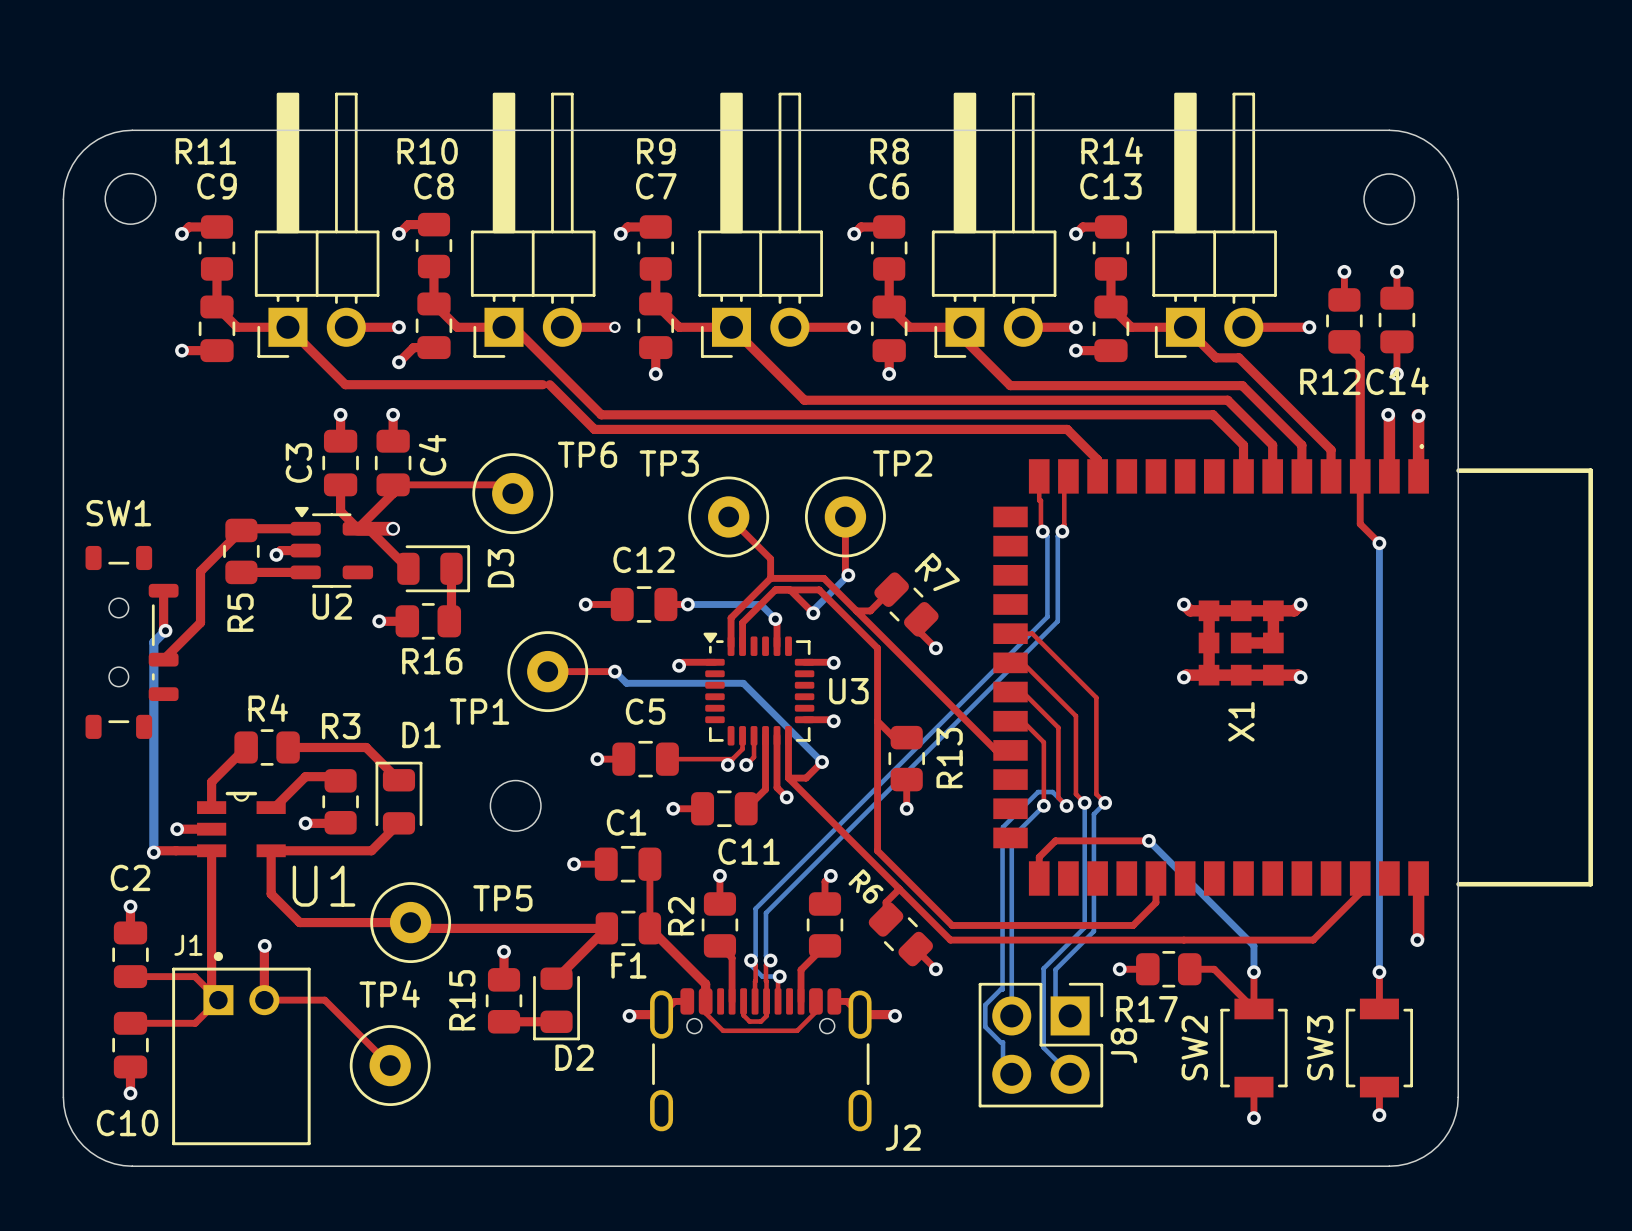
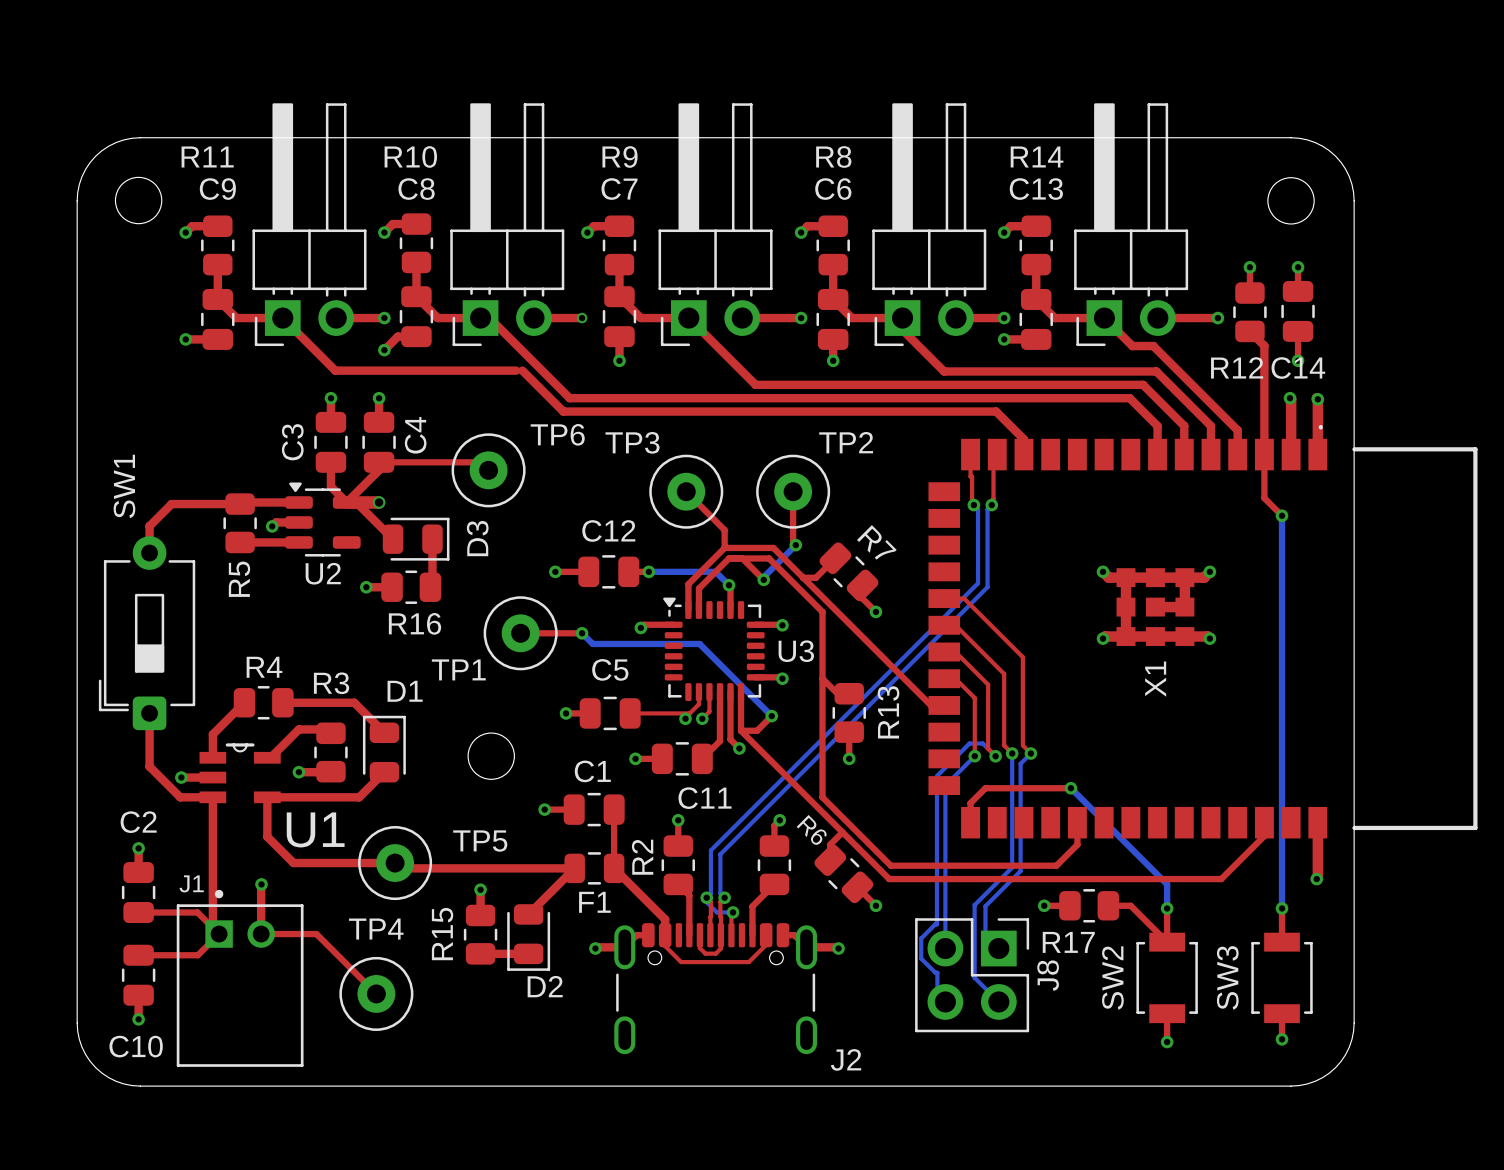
top track: (241, 530) (200, 571) (200, 622) (163, 659) -> (240, 504) (171, 504) (149, 526) (149, 553)
SW1 footprint: [85, 545, 179, 739] -> [98, 536, 196, 731]
top track: (163, 590) (163, 628) (165, 630) -> none
bottom track: (165, 630) (153, 642) (153, 852) -> none
via: (165, 630) -> none
top track: (176, 850) (155, 850) (153, 852) -> (180, 797) (149, 766) (149, 713)
via: (153, 852) -> none

